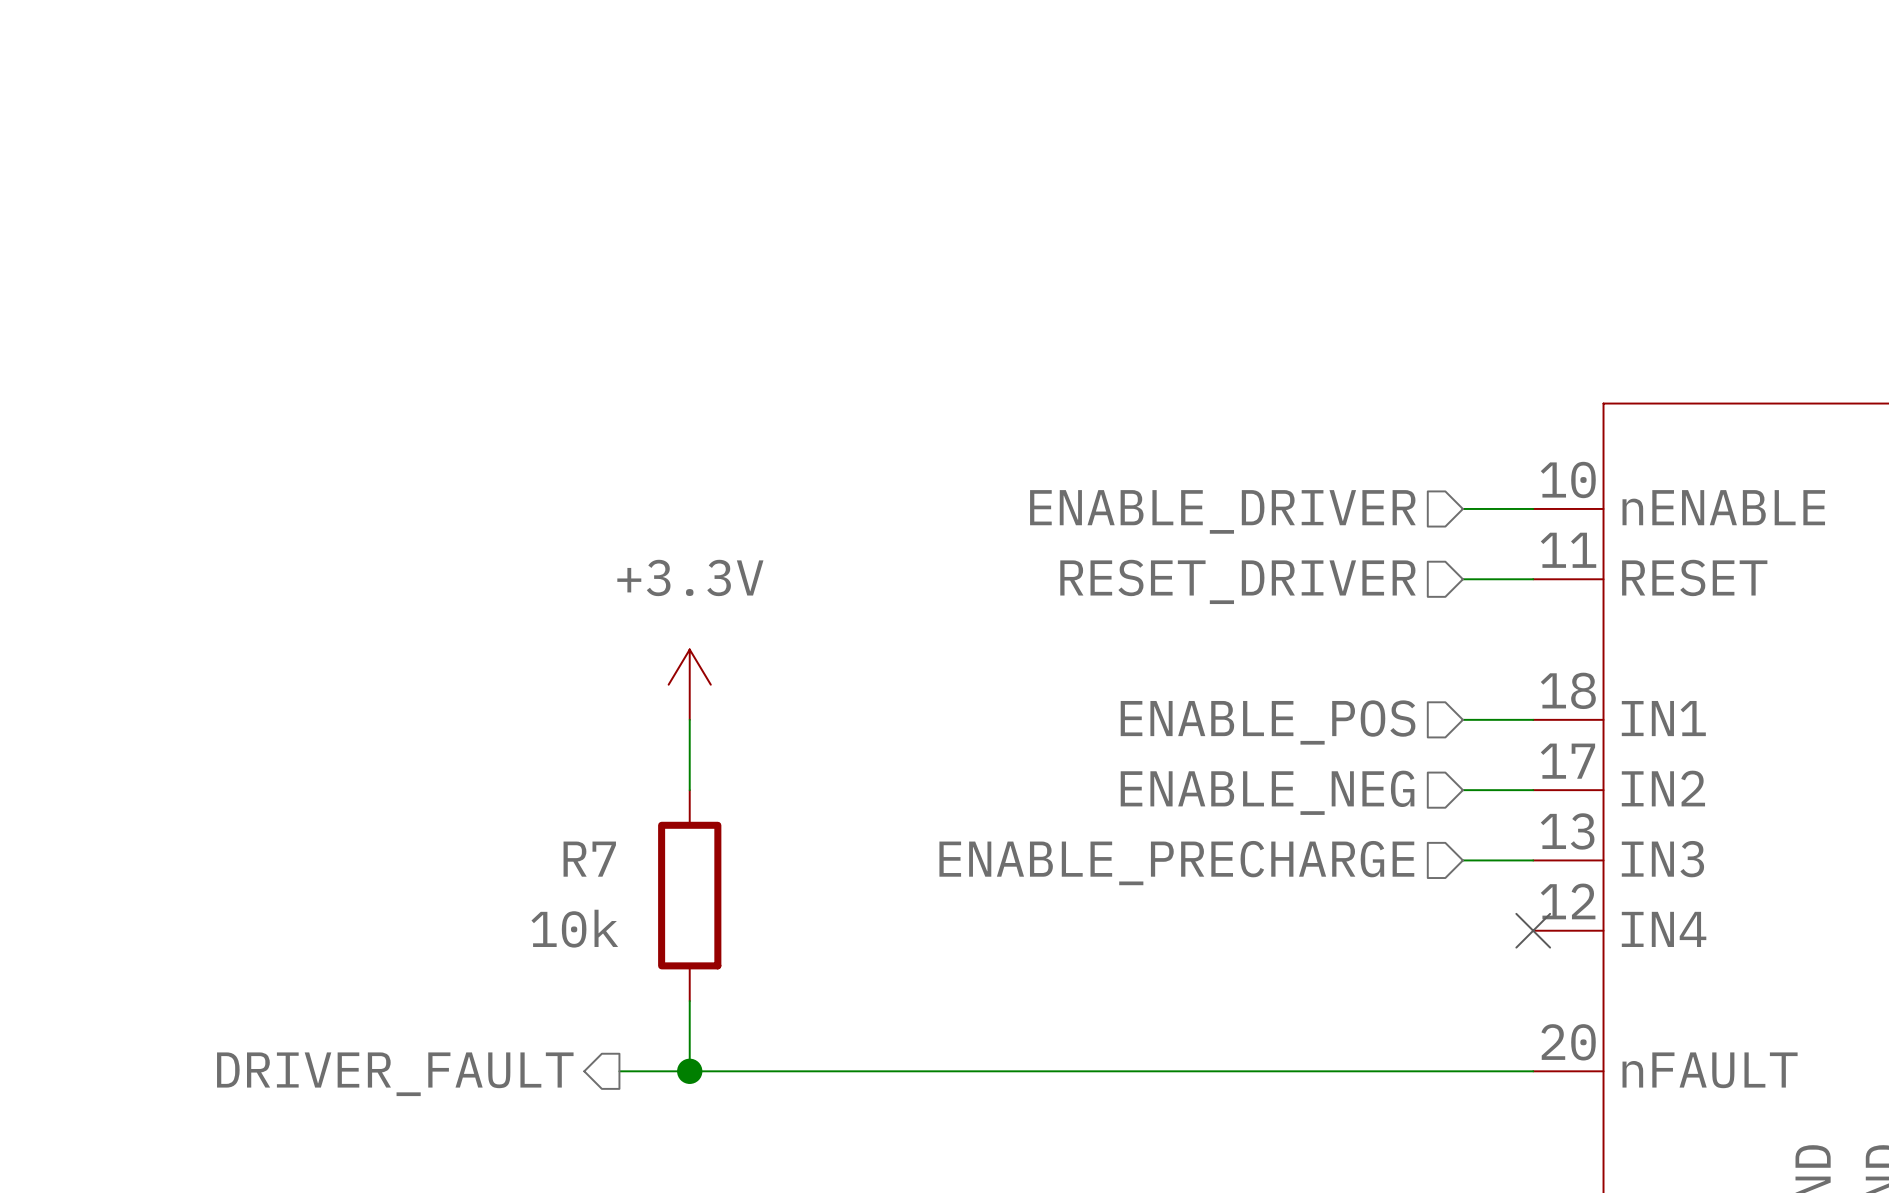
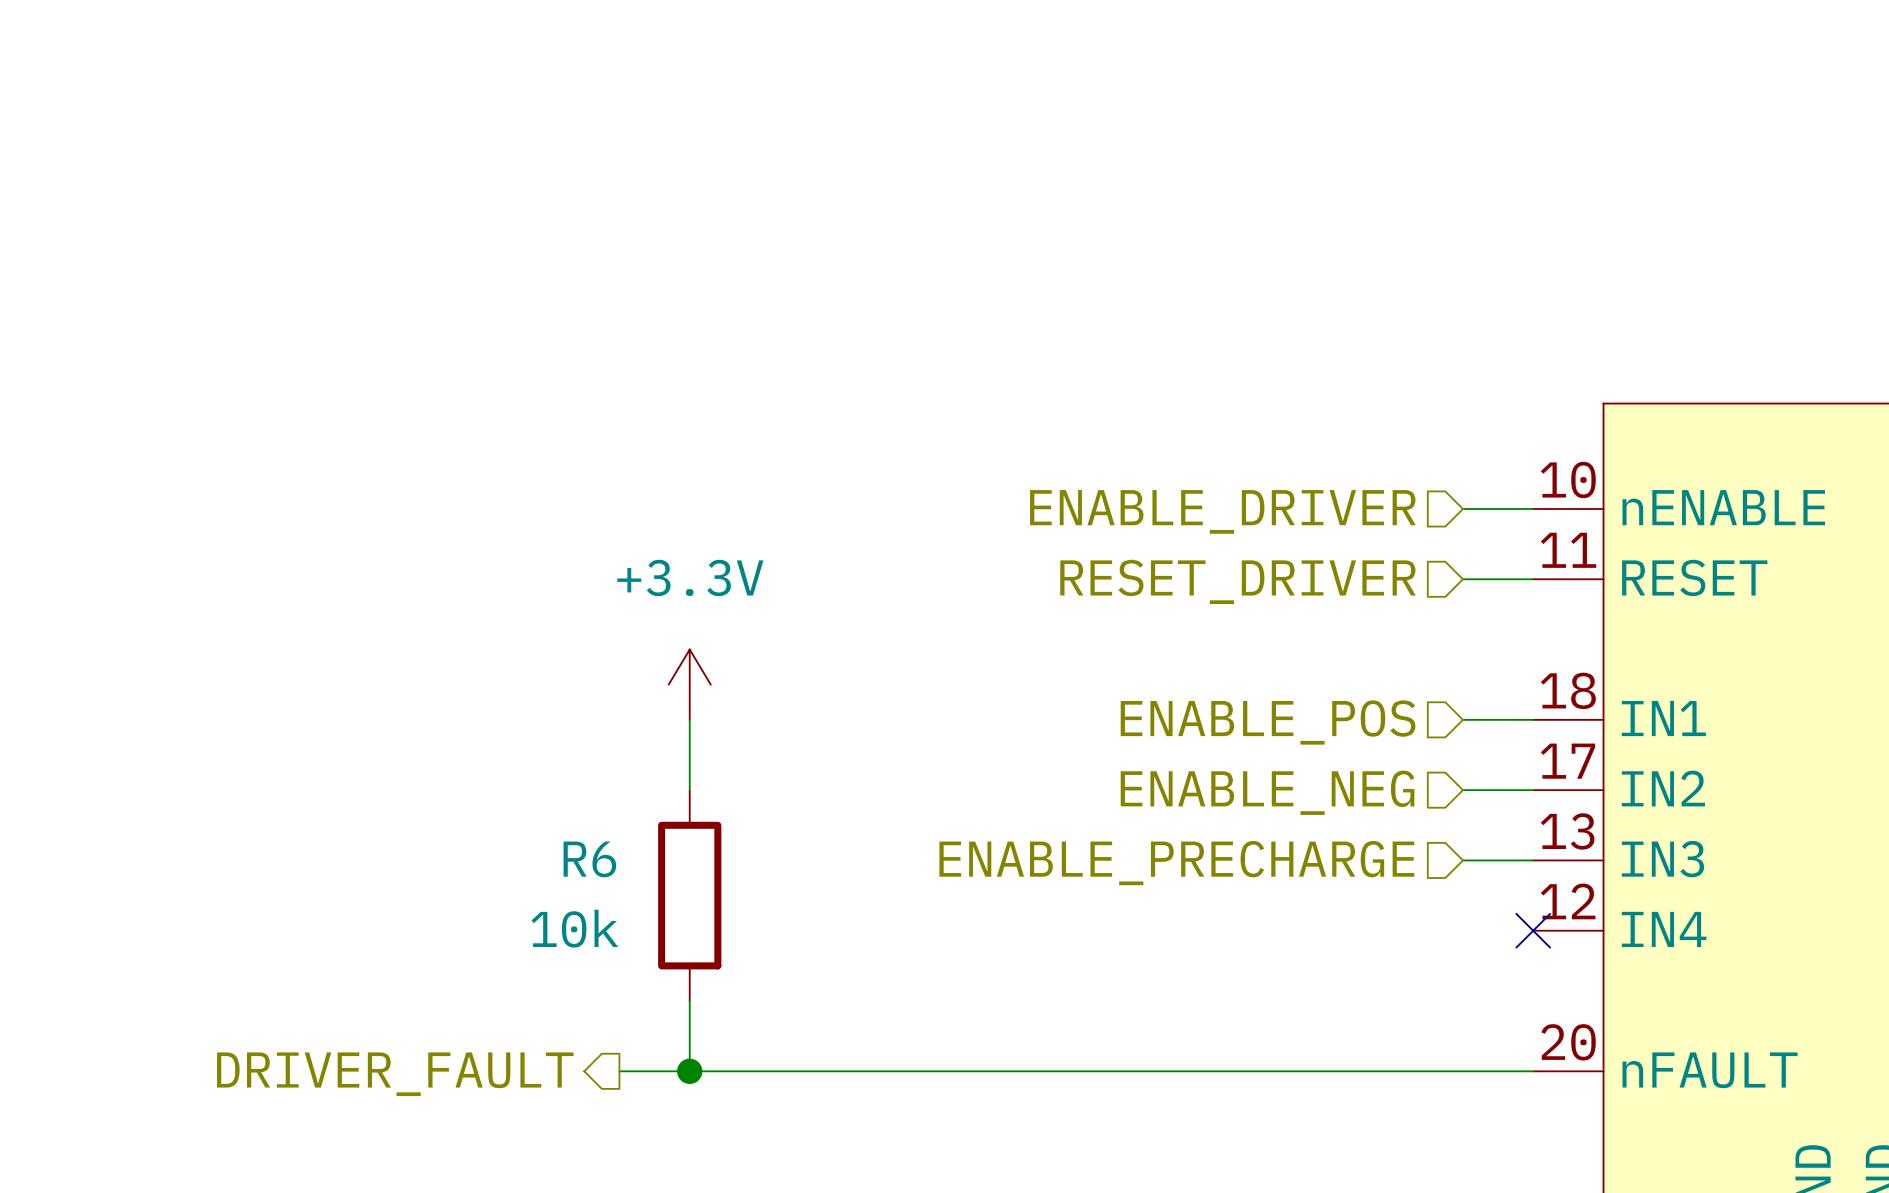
R7 name: R7 (589, 859) -> R6 (589, 859)

